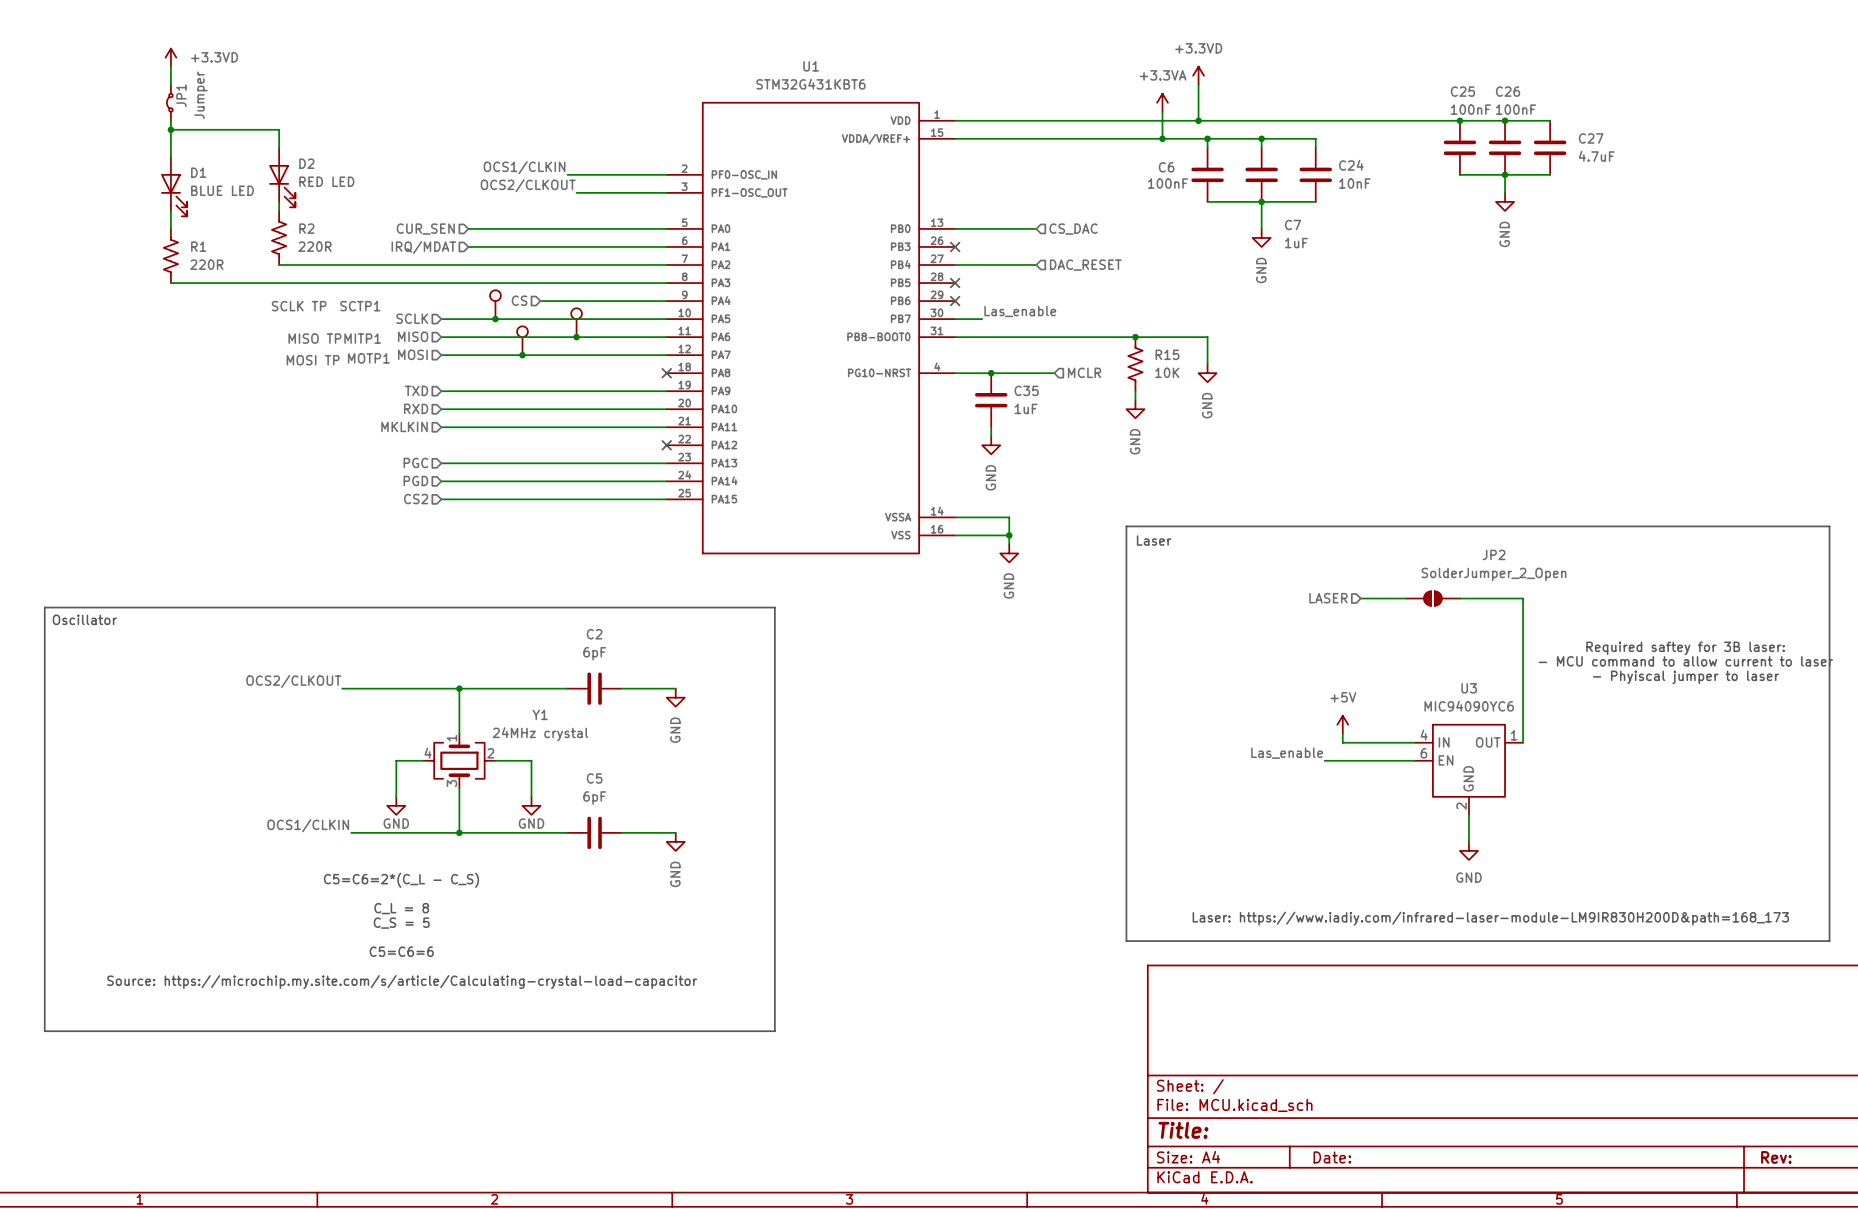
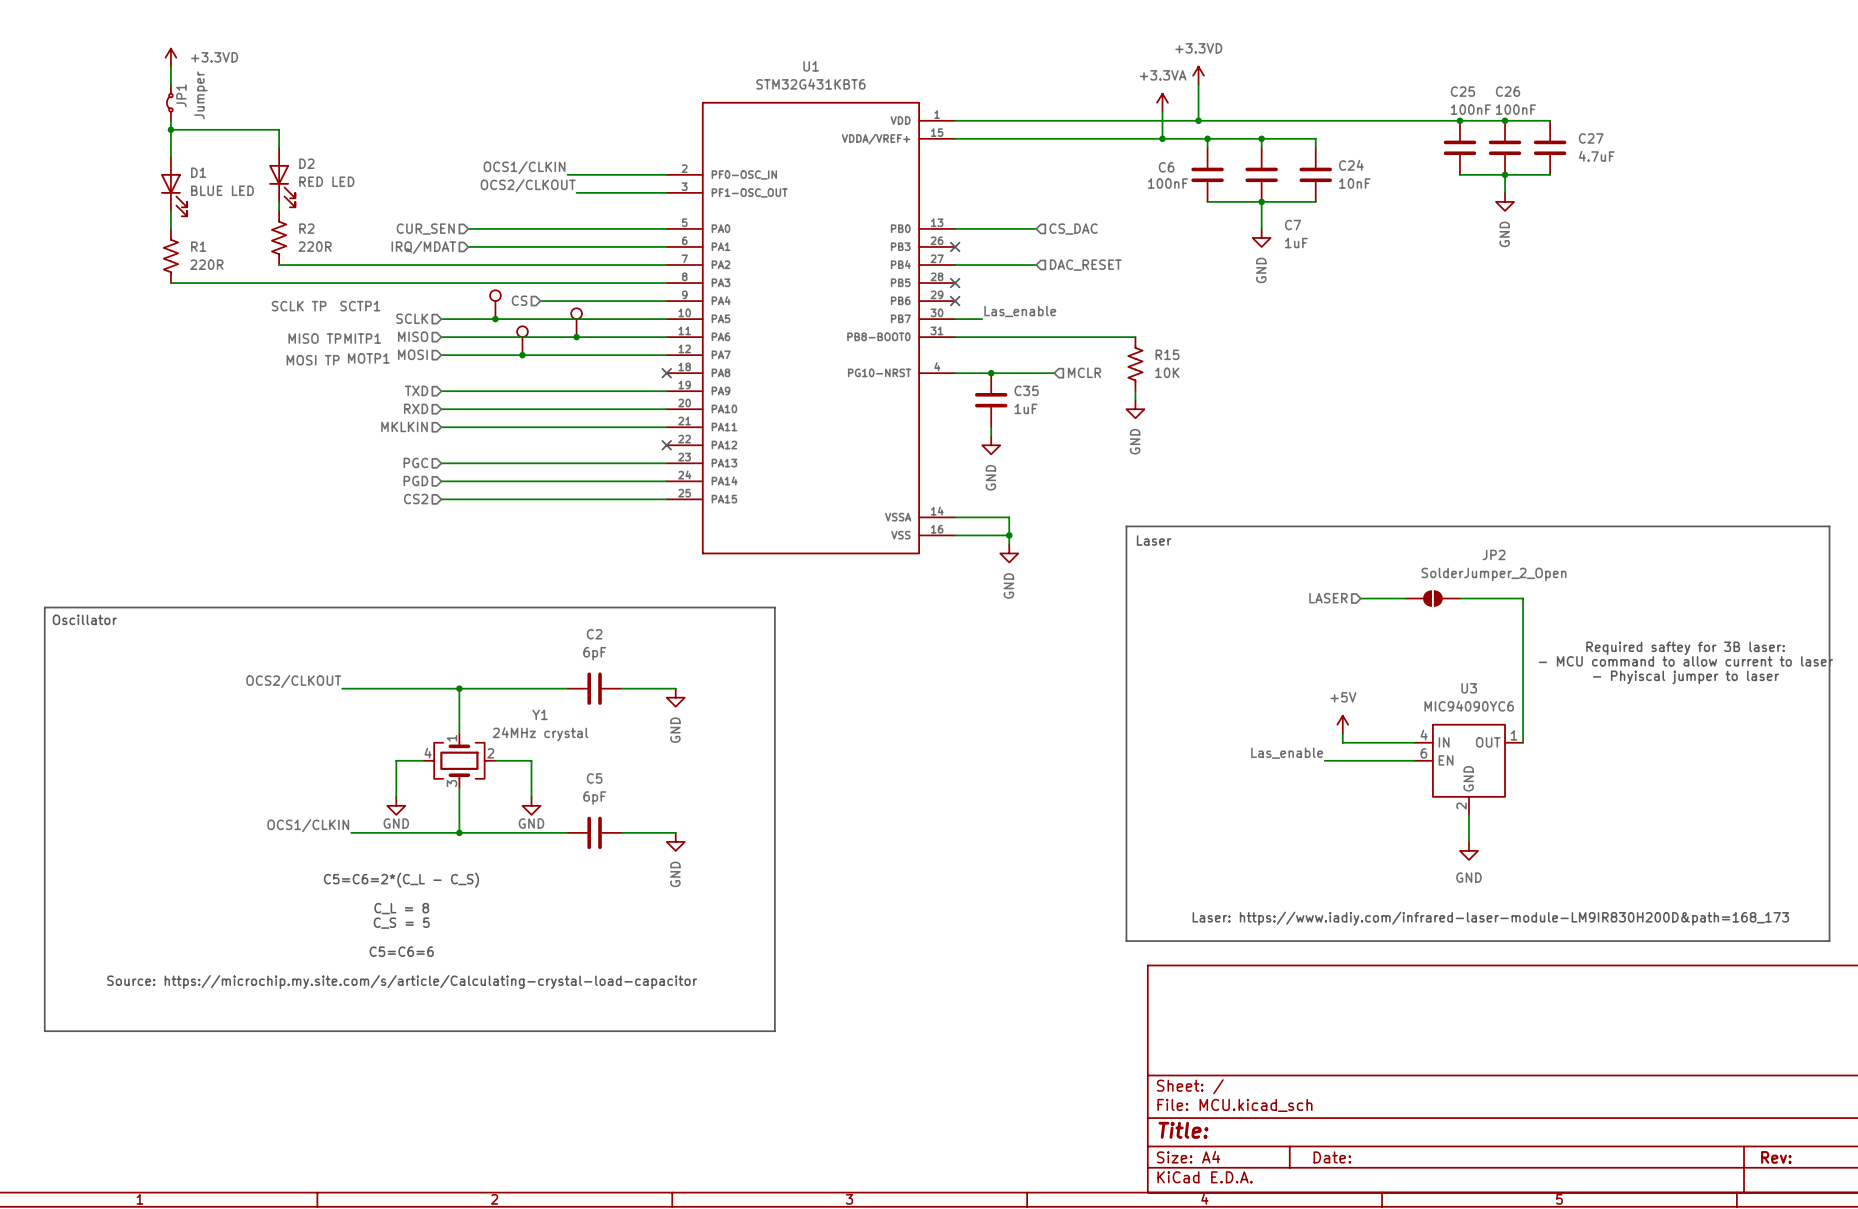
wire: (1135, 337) (1207, 337) (1207, 364) -> none
junction: (1135, 337) -> none
power symbol: GND (1207, 373) -> none

